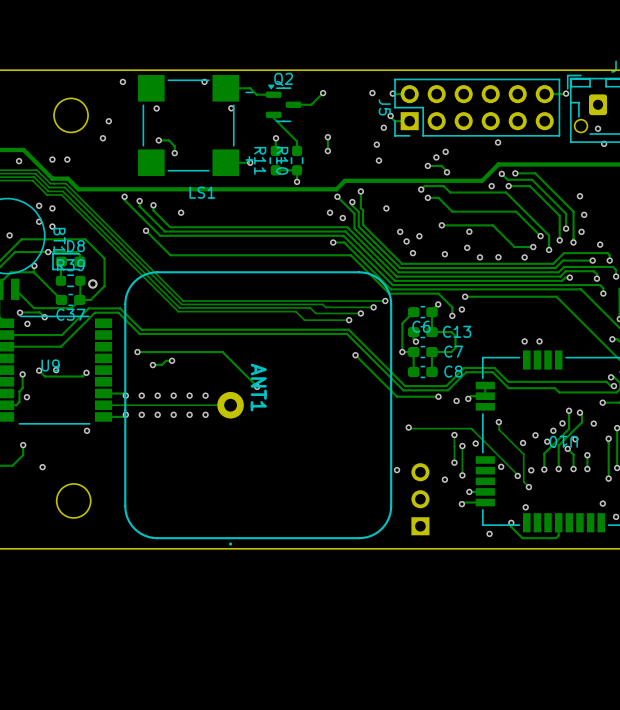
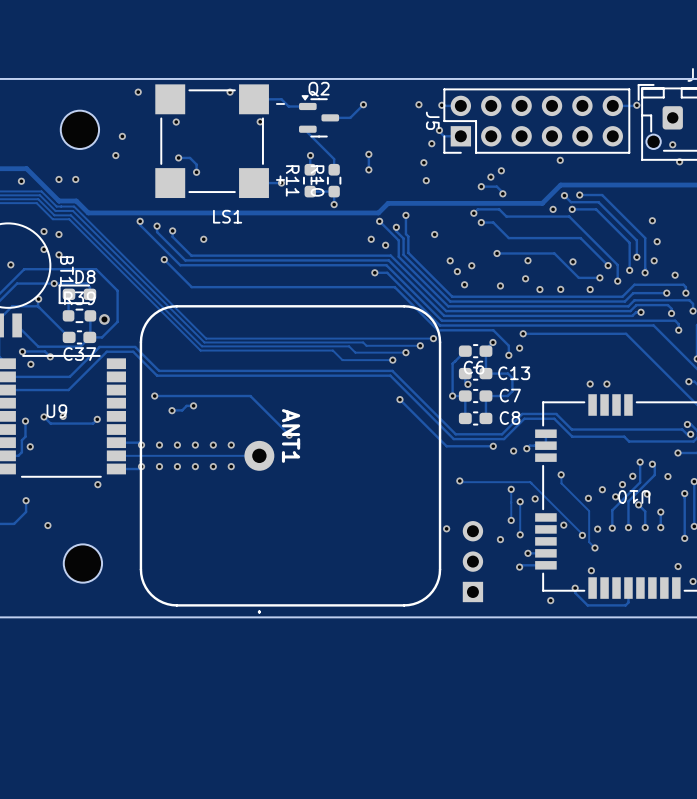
via: none -> (572, 261)

